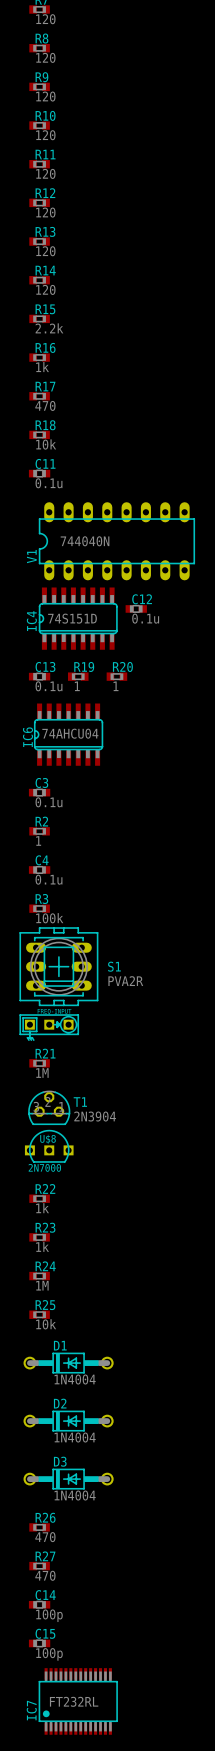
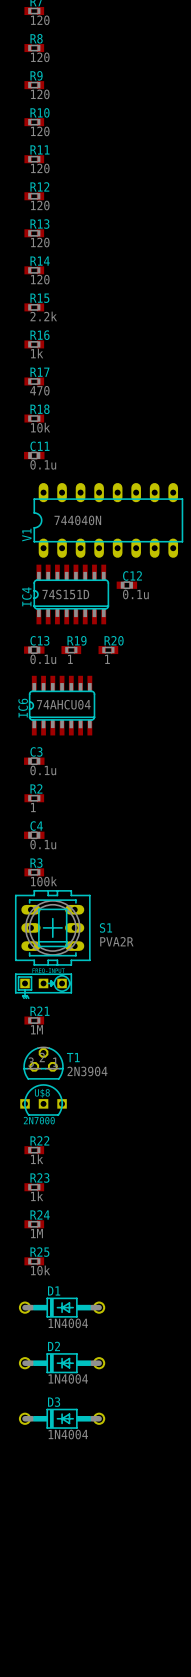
R26: 470 (39, 1527) -> none
R27: 470 (39, 1566) -> none
C14: 100p (39, 1604) -> none
C15: 100p (39, 1643) -> none
IC7: FT232RL (78, 1701) -> none

